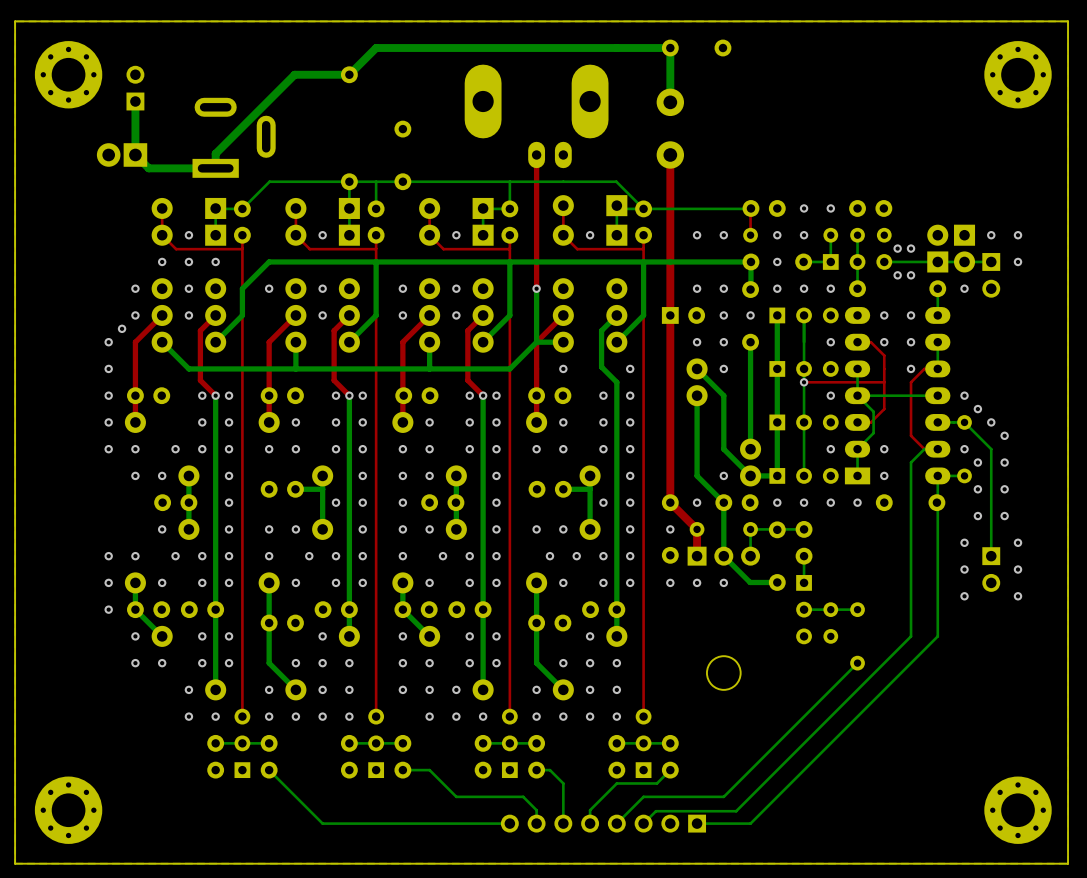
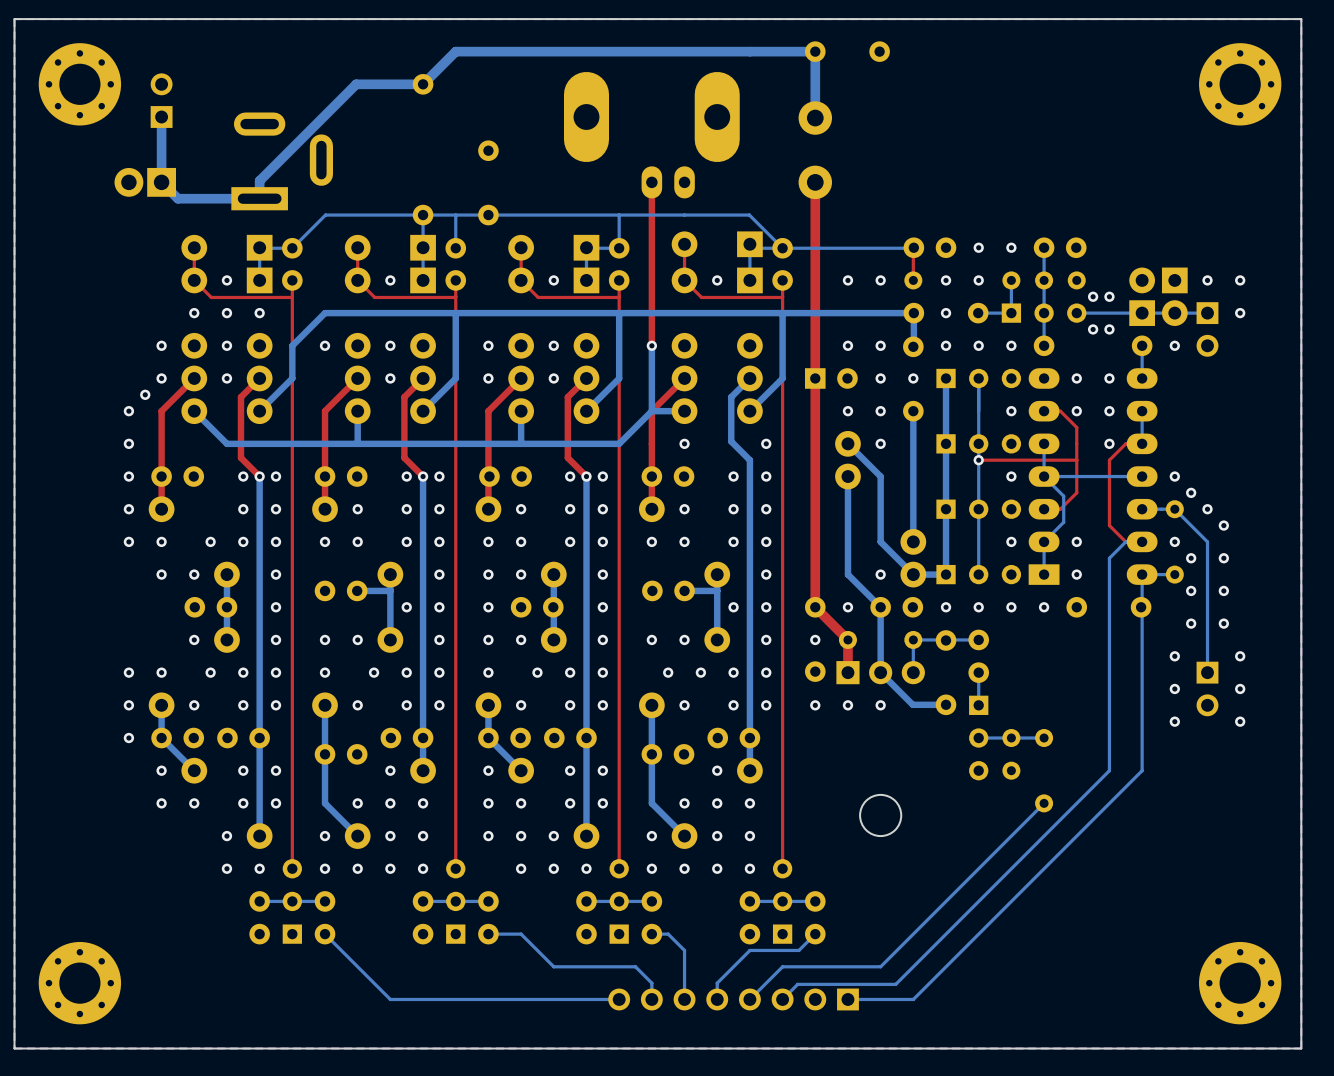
bottom track: none -> (1044, 247) (1044, 280)

